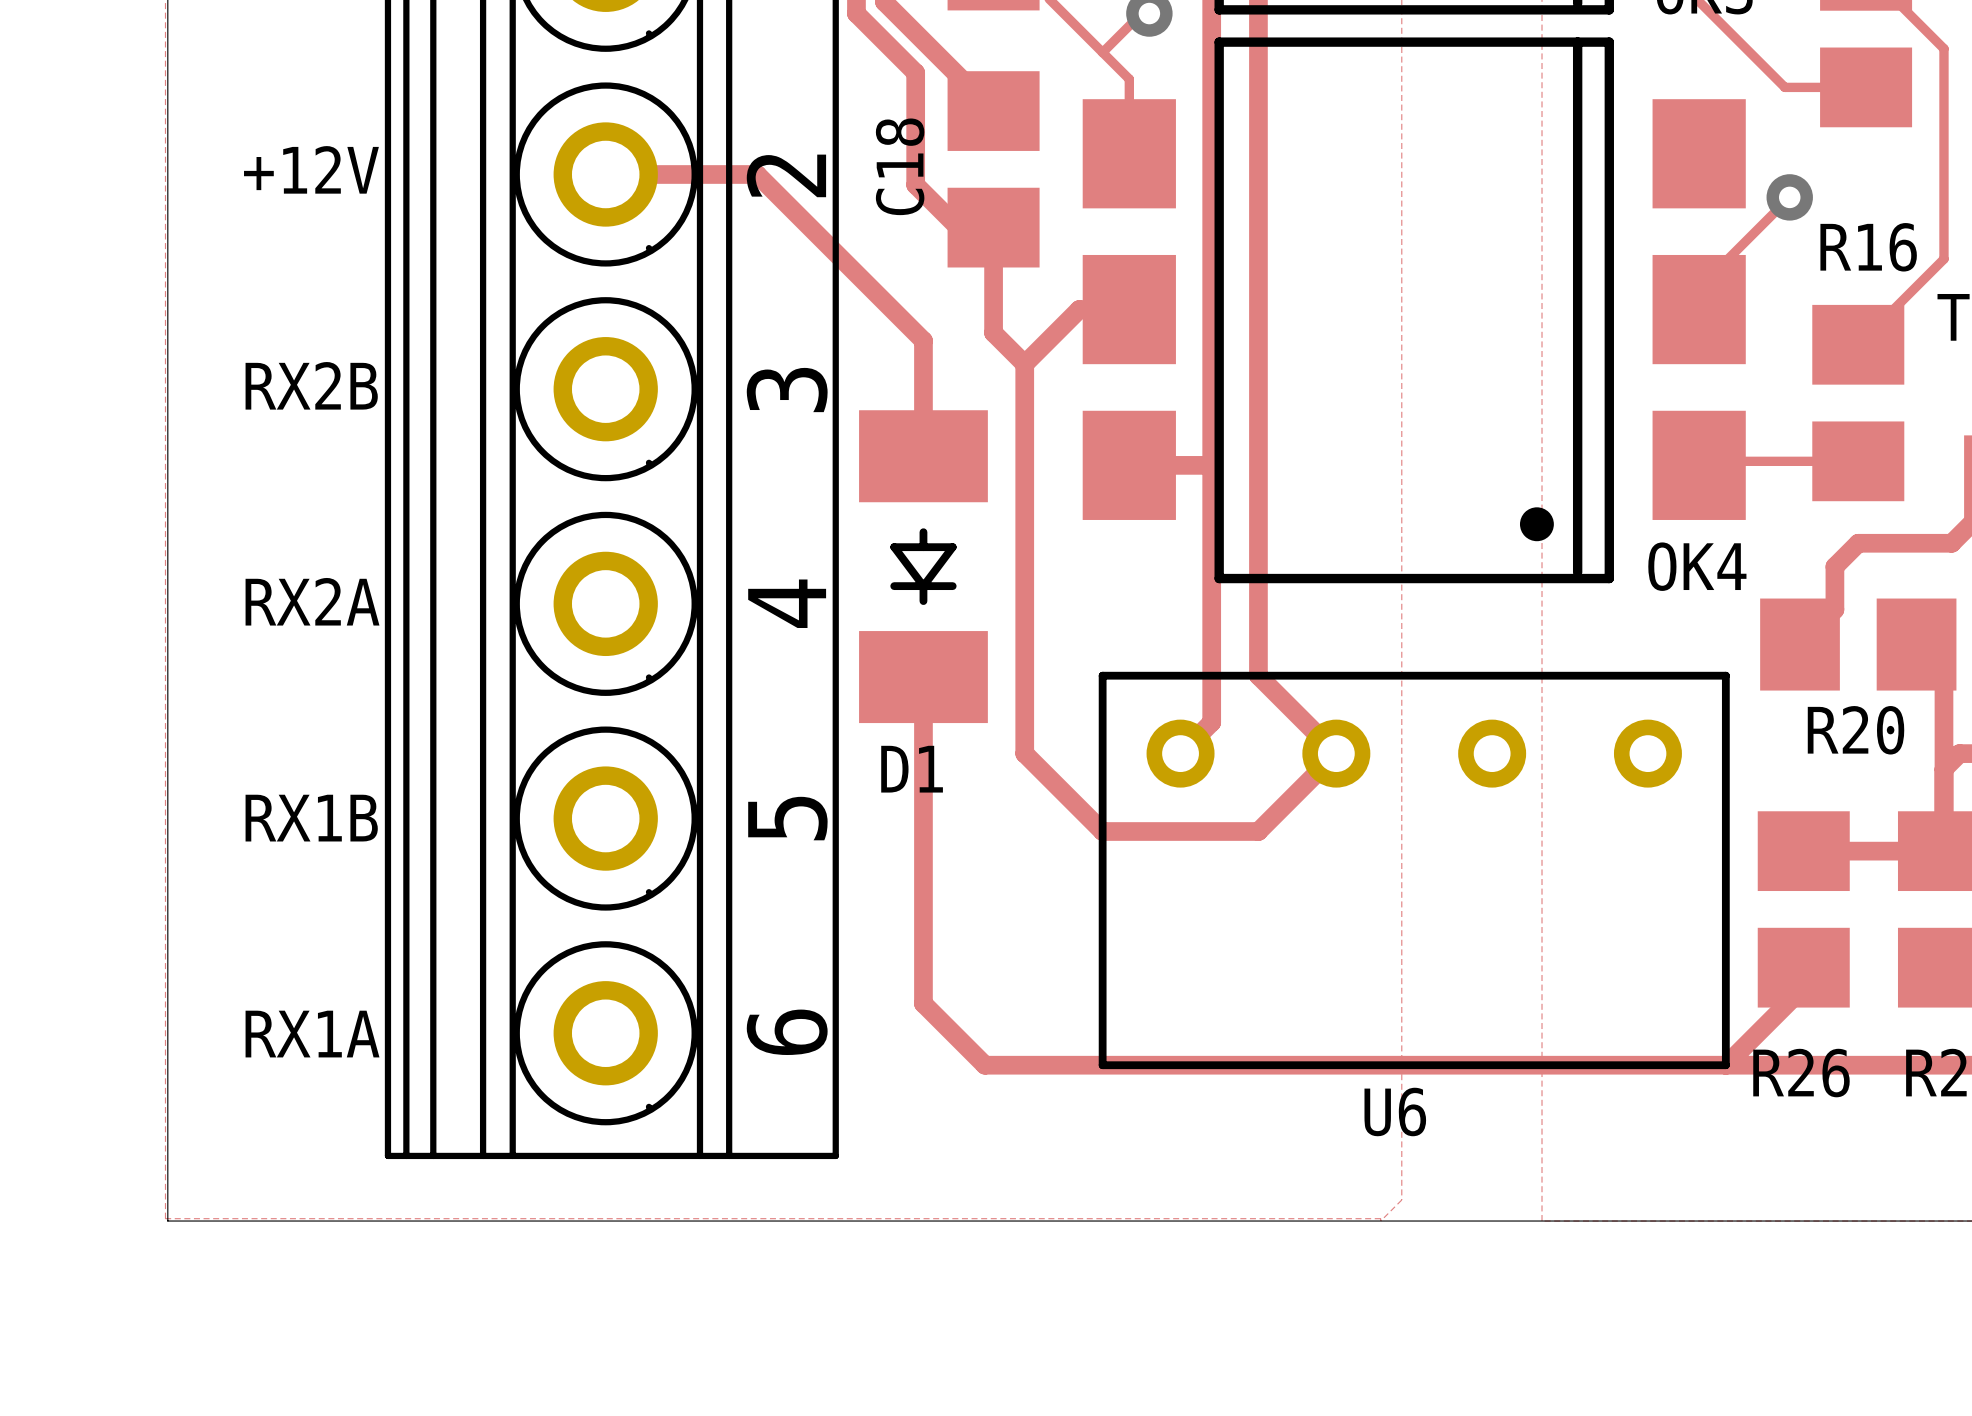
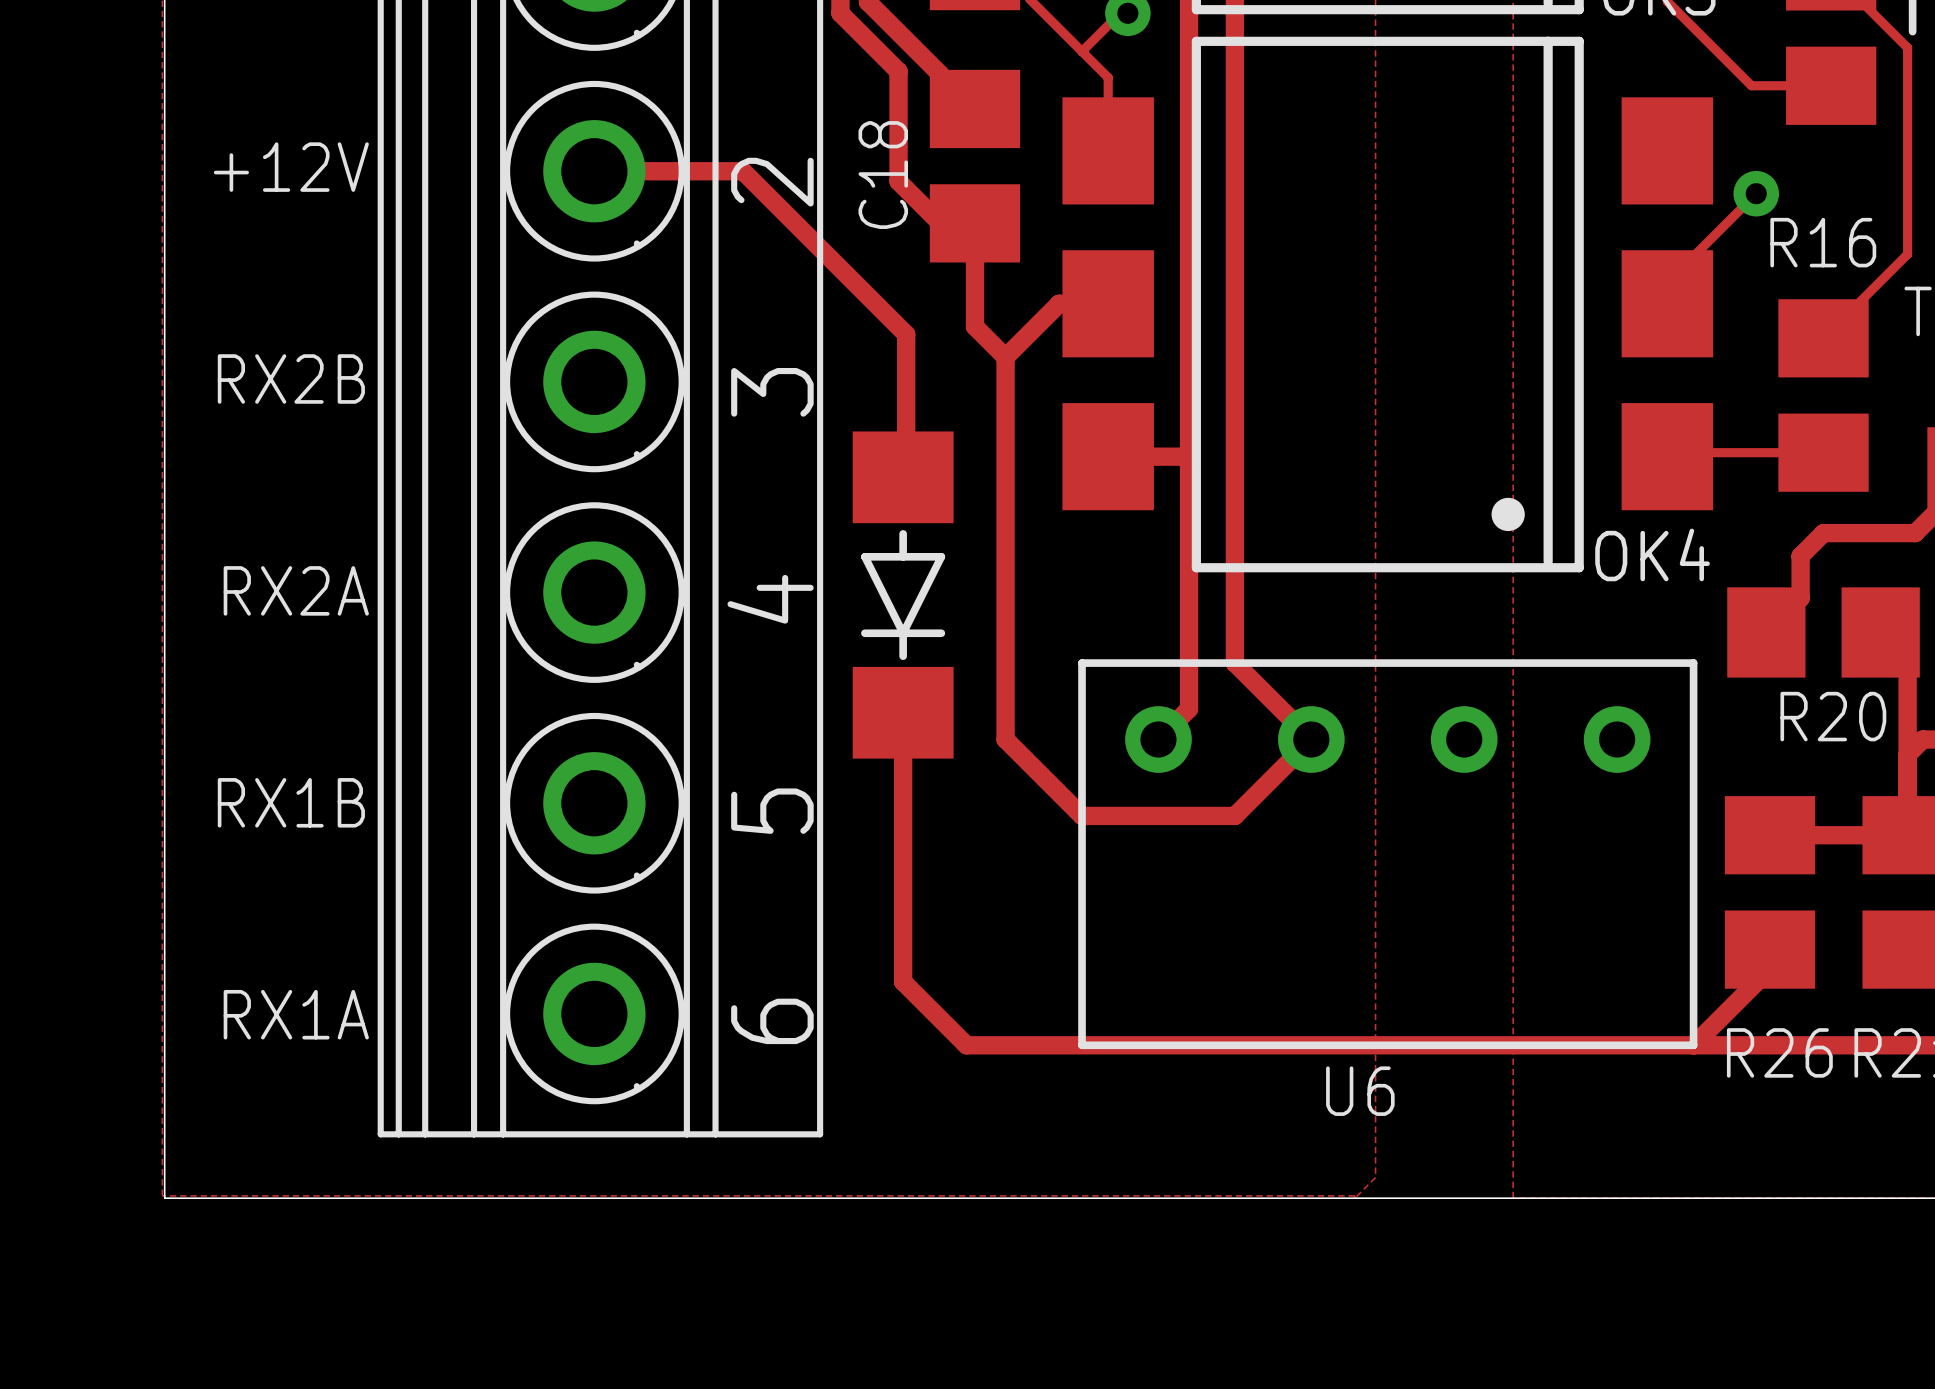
D1: (923, 566) -> none
part: none -> (903, 595)
track: (923, 677) (923, 1003) -> (903, 712) (903, 981) (906, 984)

